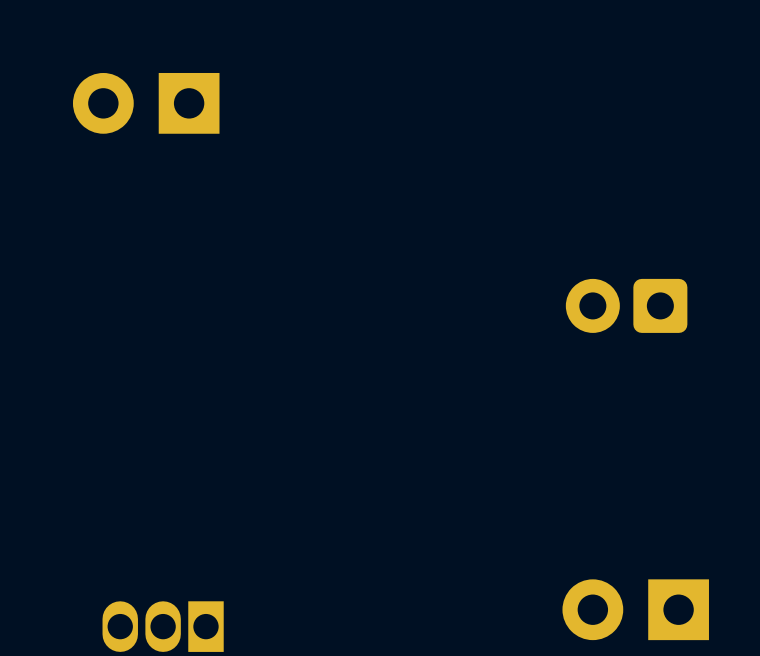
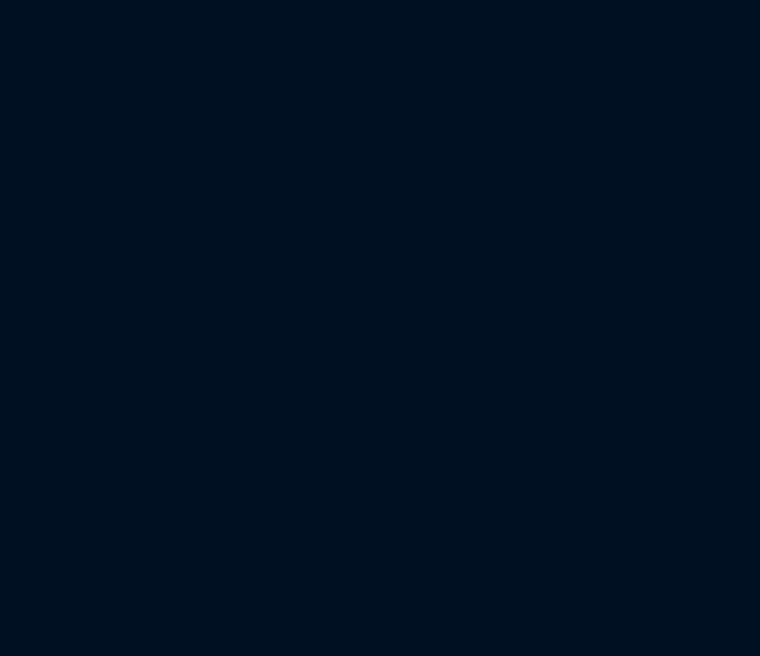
part: (146, 103) -> none
part: (626, 305) -> none
part: (635, 609) -> none
part: (163, 626) -> none

